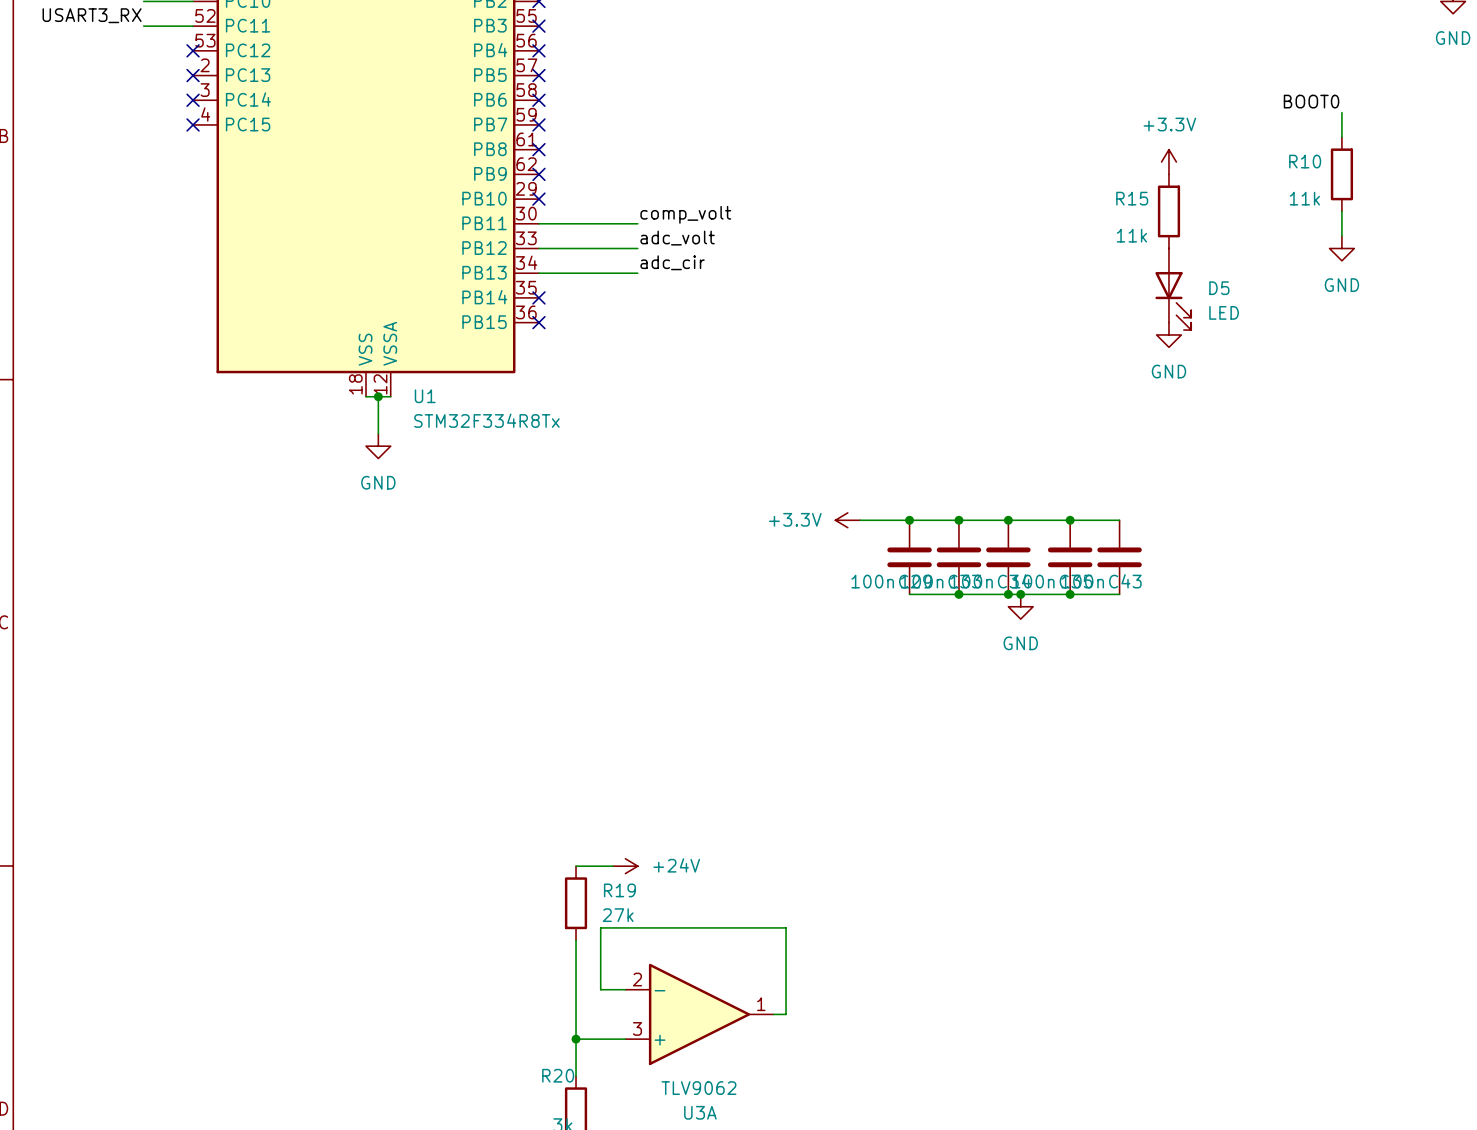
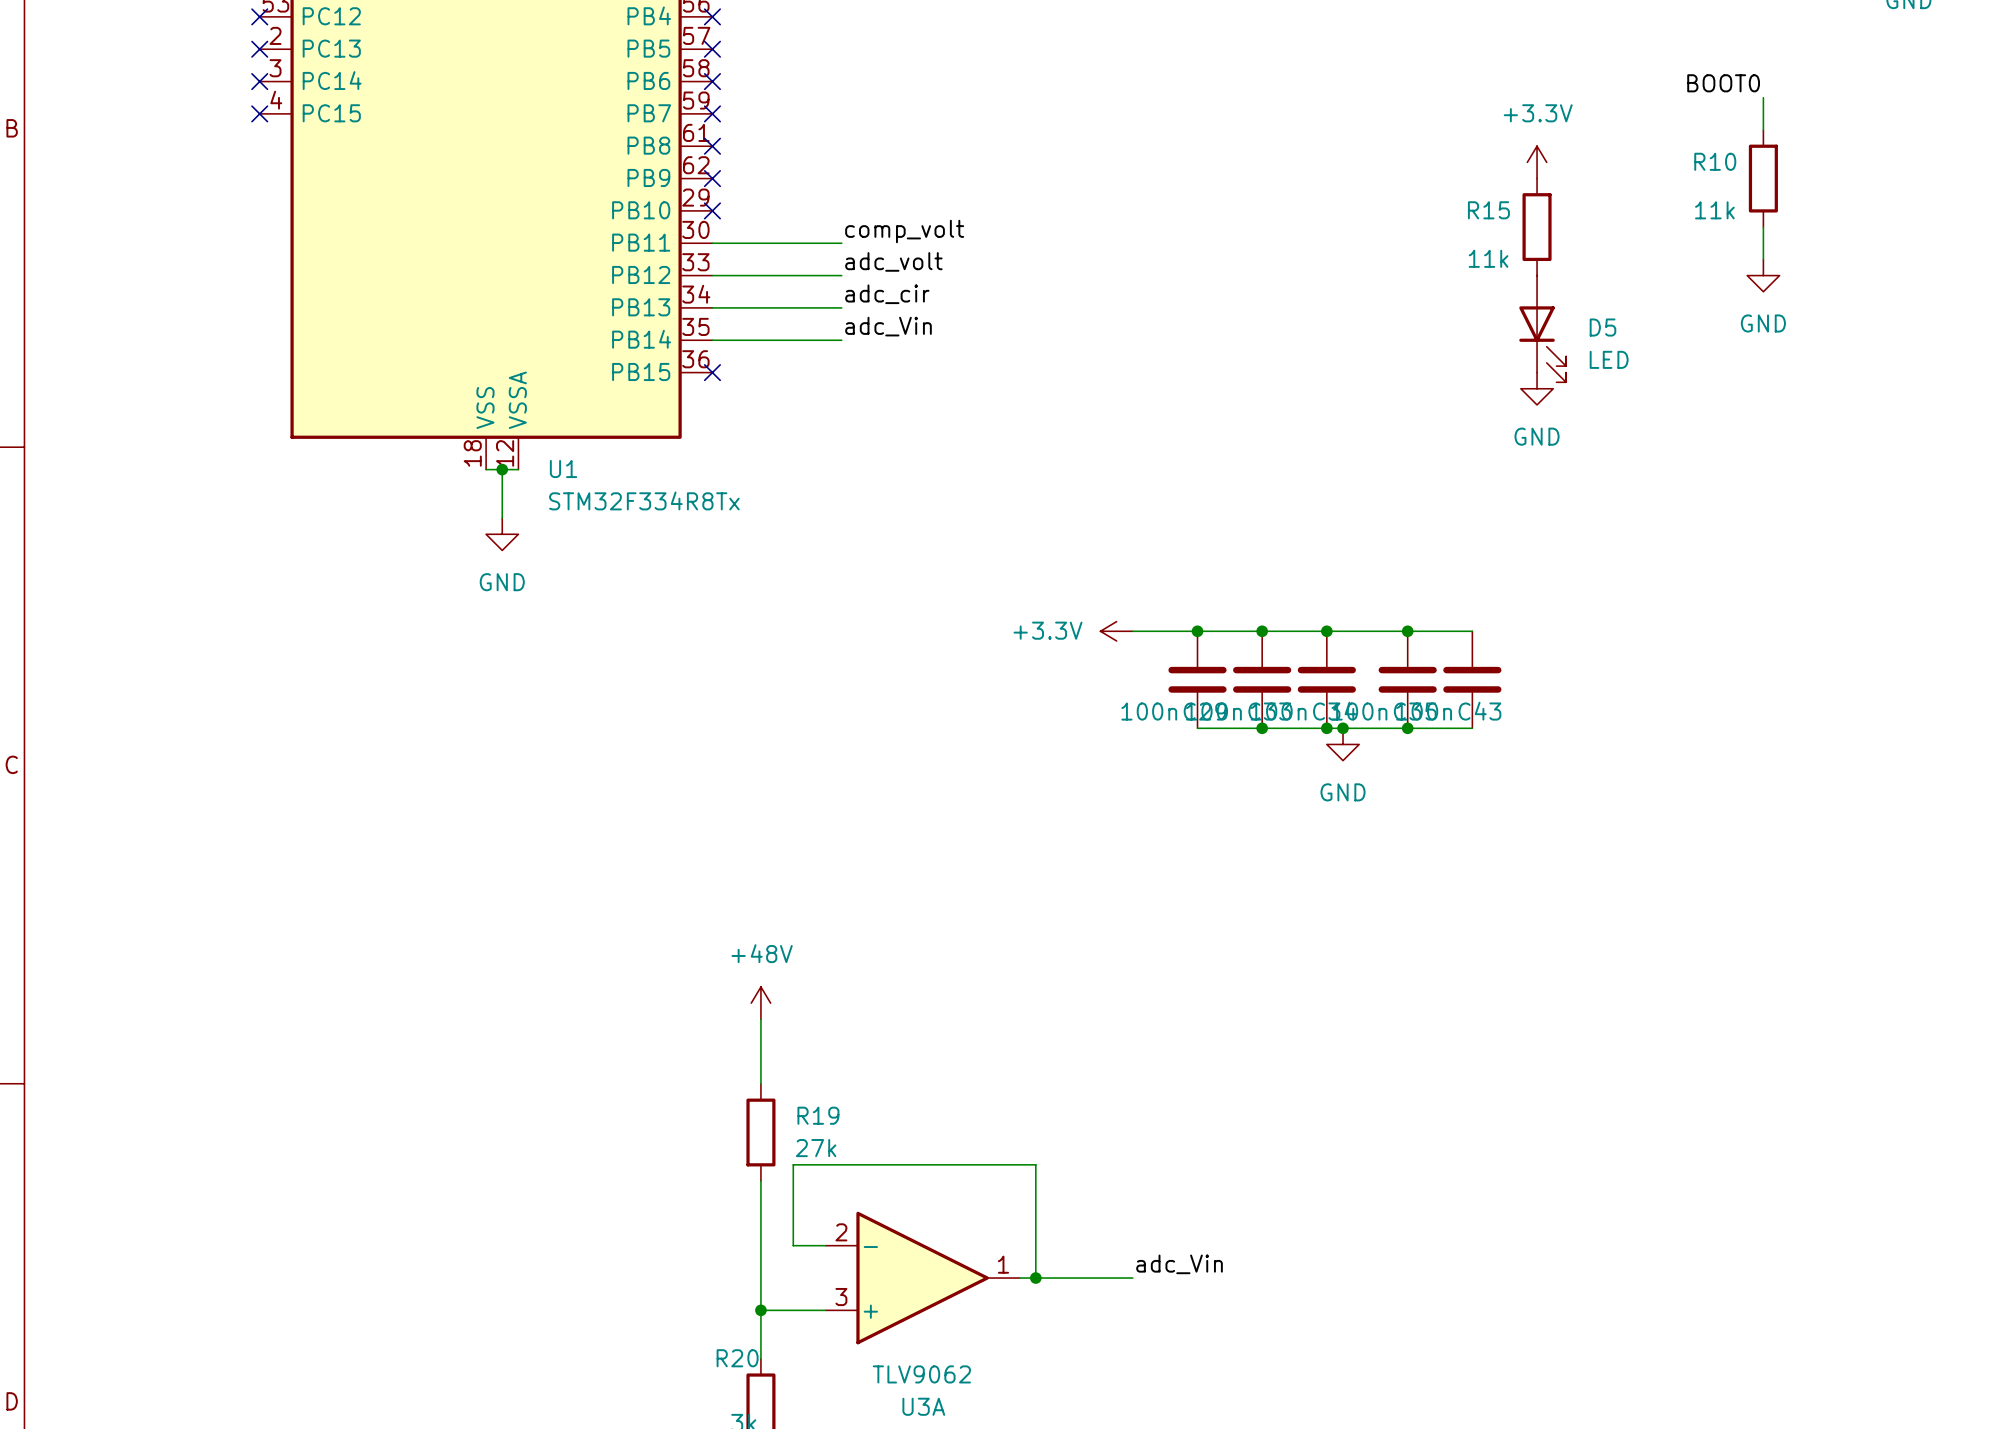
label: none -> adc_Vin (888, 326)
wire: none -> (712, 340) (841, 340)
no-connect mark: (538, 297) -> none
power symbol: none -> +48V (760, 1003)
wire: (576, 866) (613, 866) -> (760, 1084) (760, 1019)
power symbol: +24V (625, 866) -> none
label: none -> adc_Vin (1179, 1264)
wire: none -> (1035, 1278) (1132, 1278)
junction: none -> (1035, 1278)

